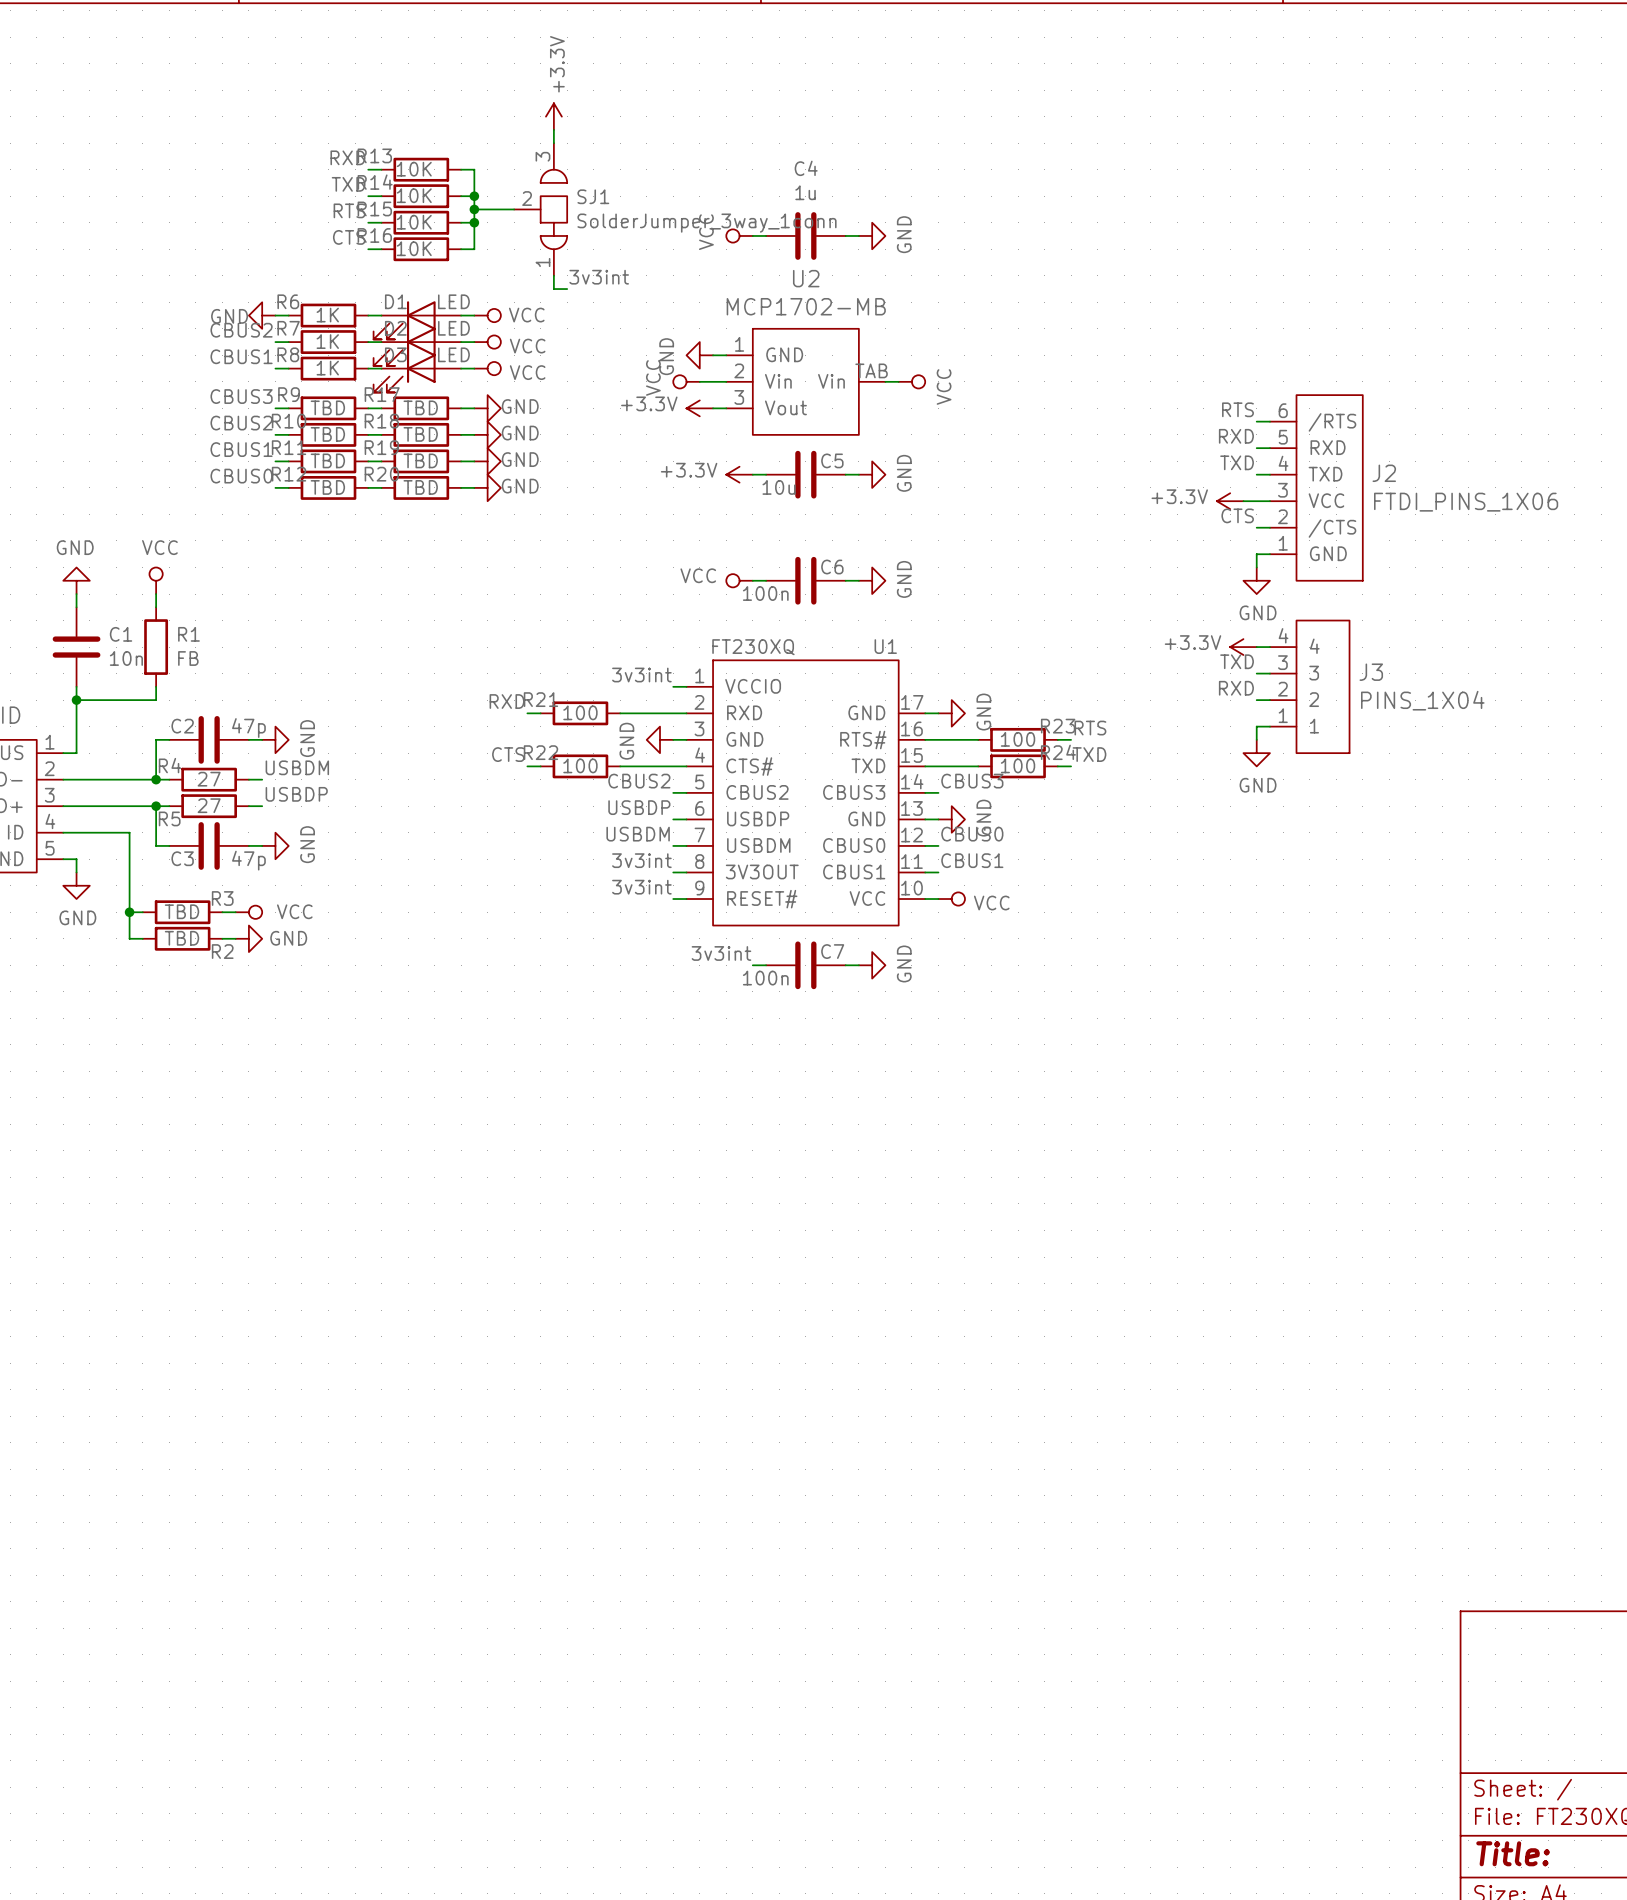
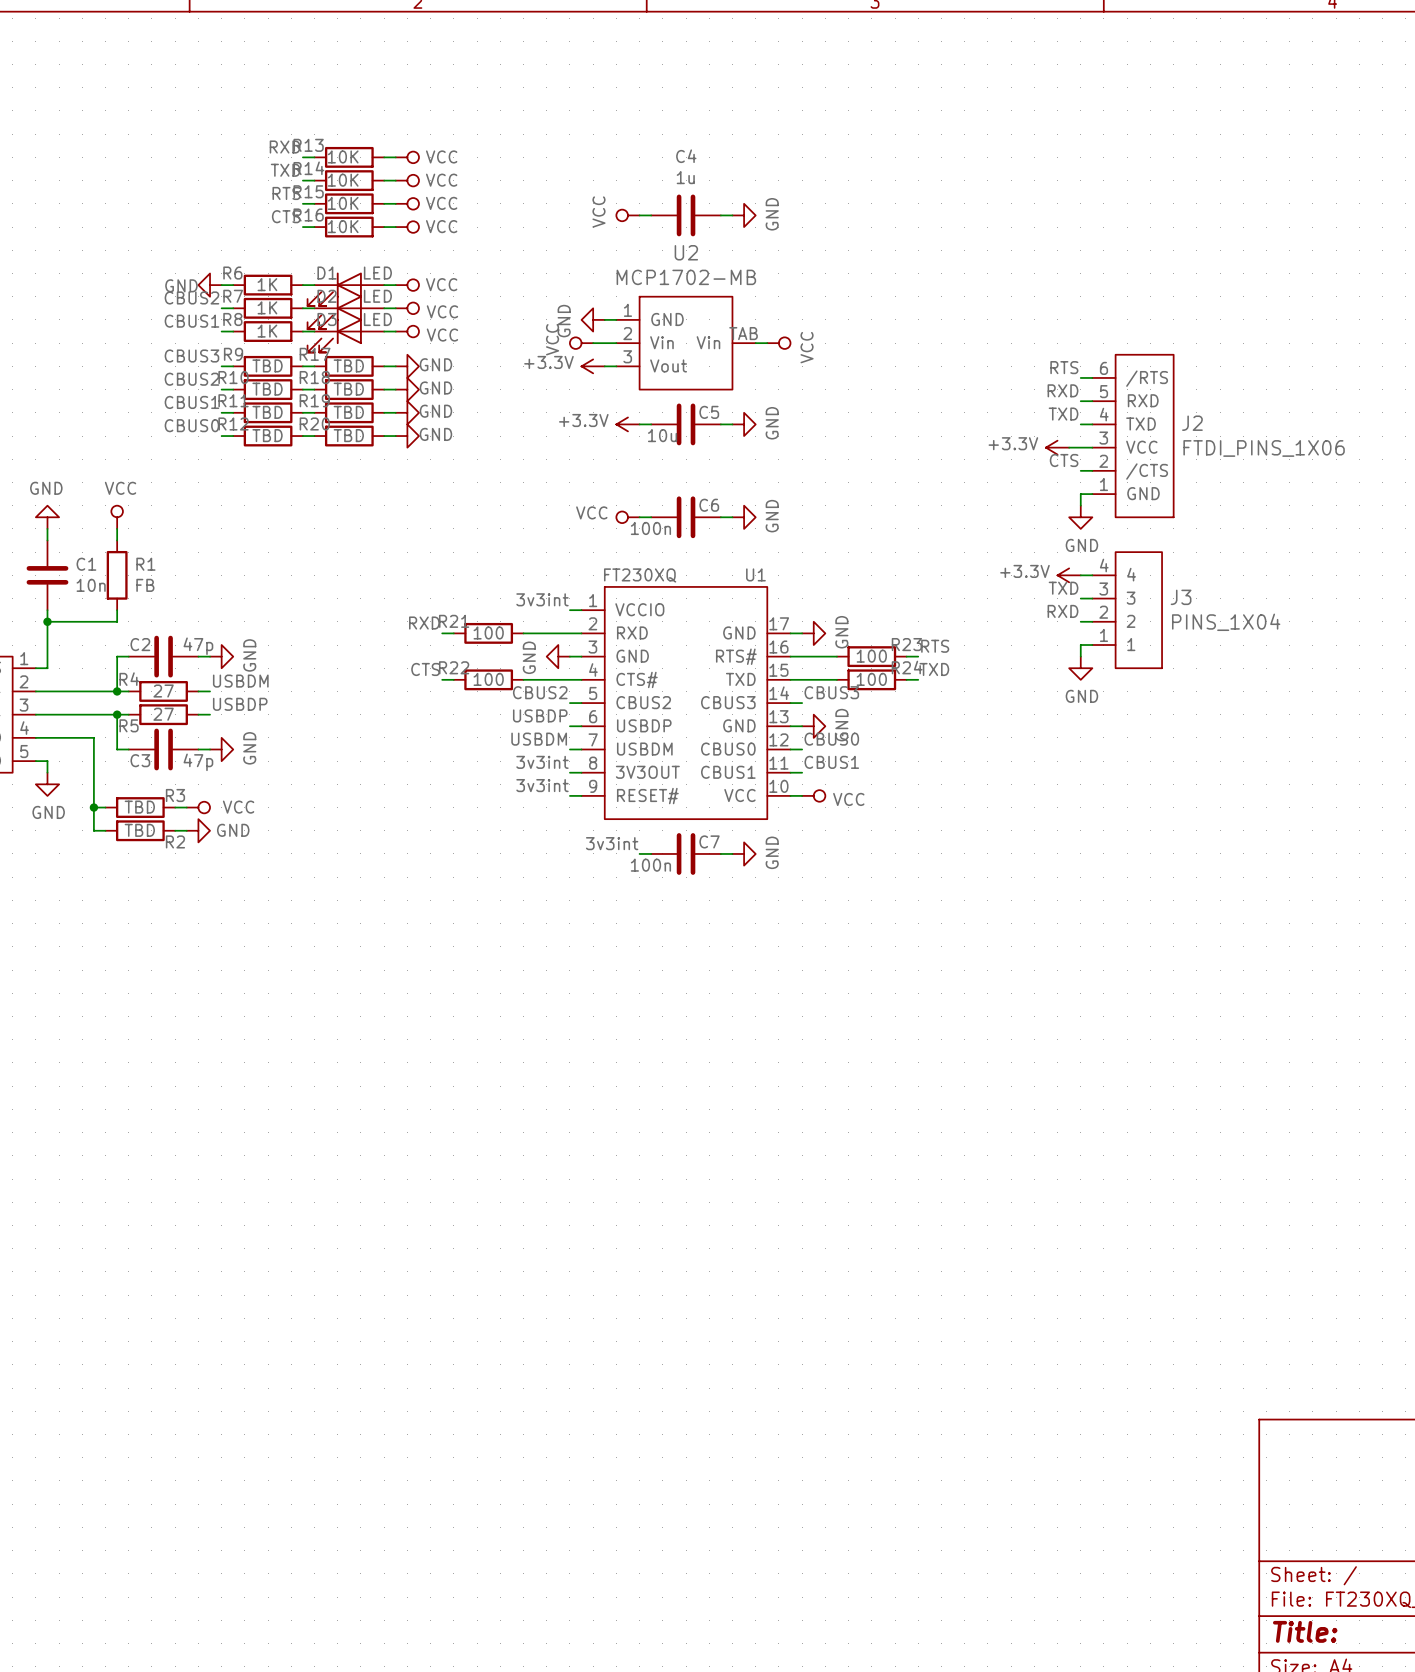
power symbol: +3.3V (553, 116) -> none
wire: (553, 129) (553, 143) -> none
wire: (474, 169) (474, 249) -> none
power symbol: none -> VCC (407, 157)
junction: (474, 196) -> none
power symbol: none -> VCC (407, 180)
wire: (474, 209) (514, 209) -> none
junction: (474, 209) -> none
SJ1: SolderJumper_3way_1conn (540, 209) -> none
junction: (474, 222) -> none
power symbol: none -> VCC (407, 203)
power symbol: none -> VCC (407, 227)
wire: (553, 275) (553, 289) (567, 289) -> none
label: 3v3int (599, 277) -> none

